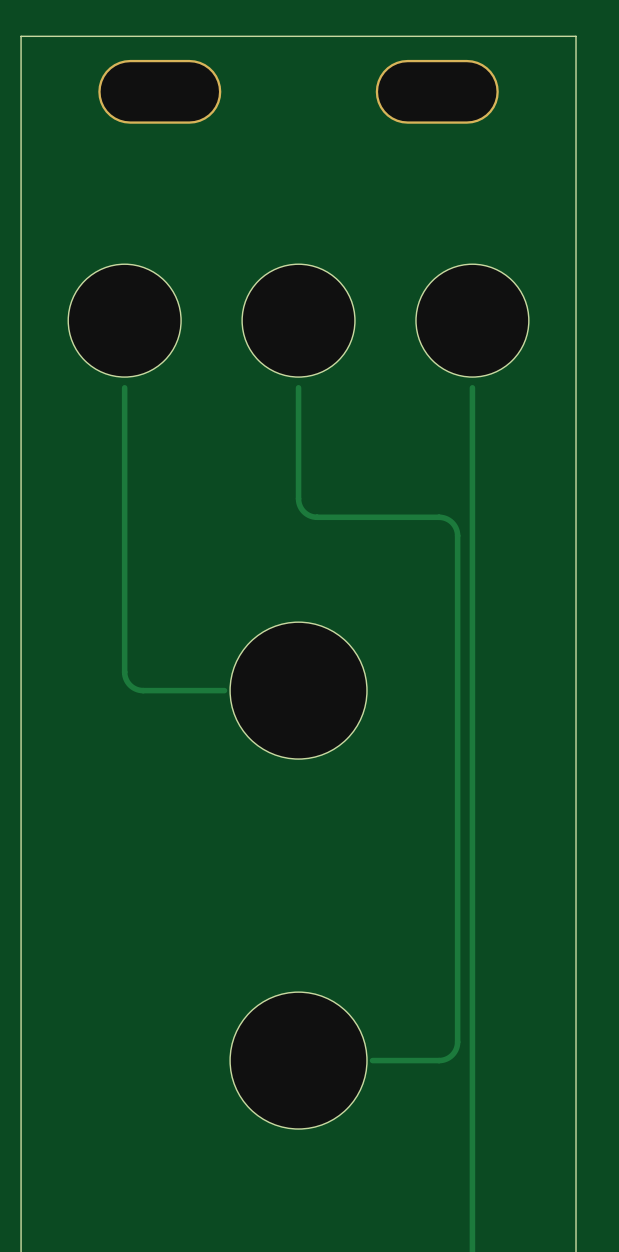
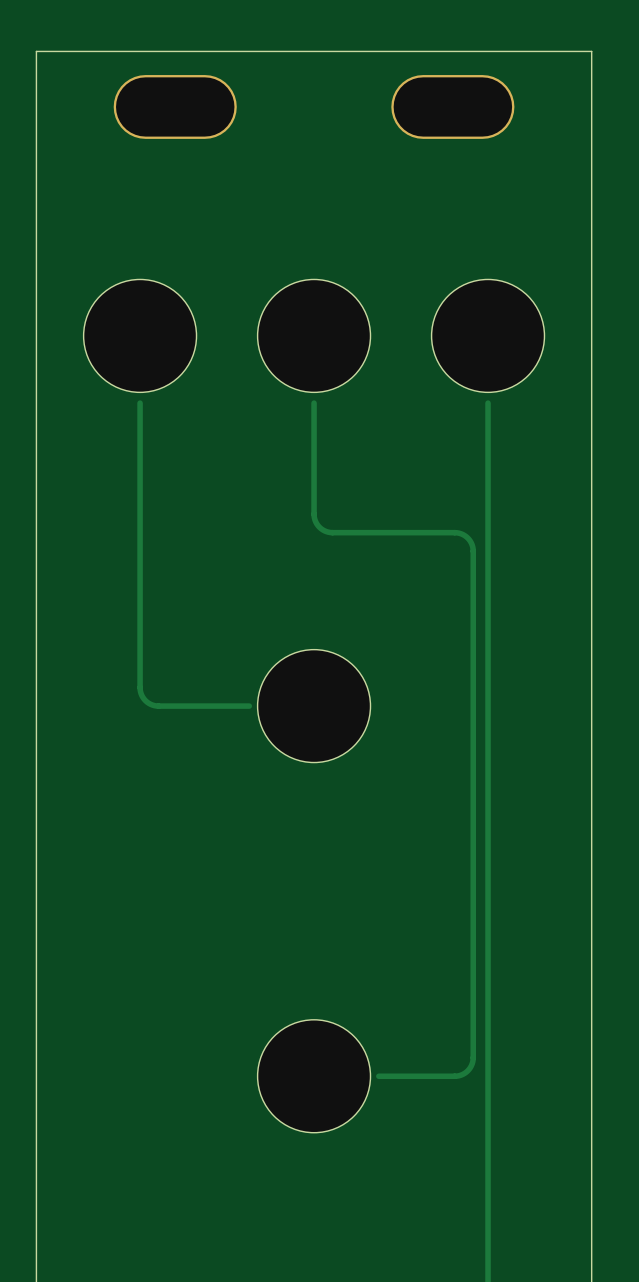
part footprint: [230, 622, 367, 760] -> [257, 649, 371, 763]
track: none -> (240, 706) (249, 706)
part footprint: [230, 992, 367, 1130] -> [257, 1019, 371, 1133]
track: none -> (378, 1076) (388, 1076)

